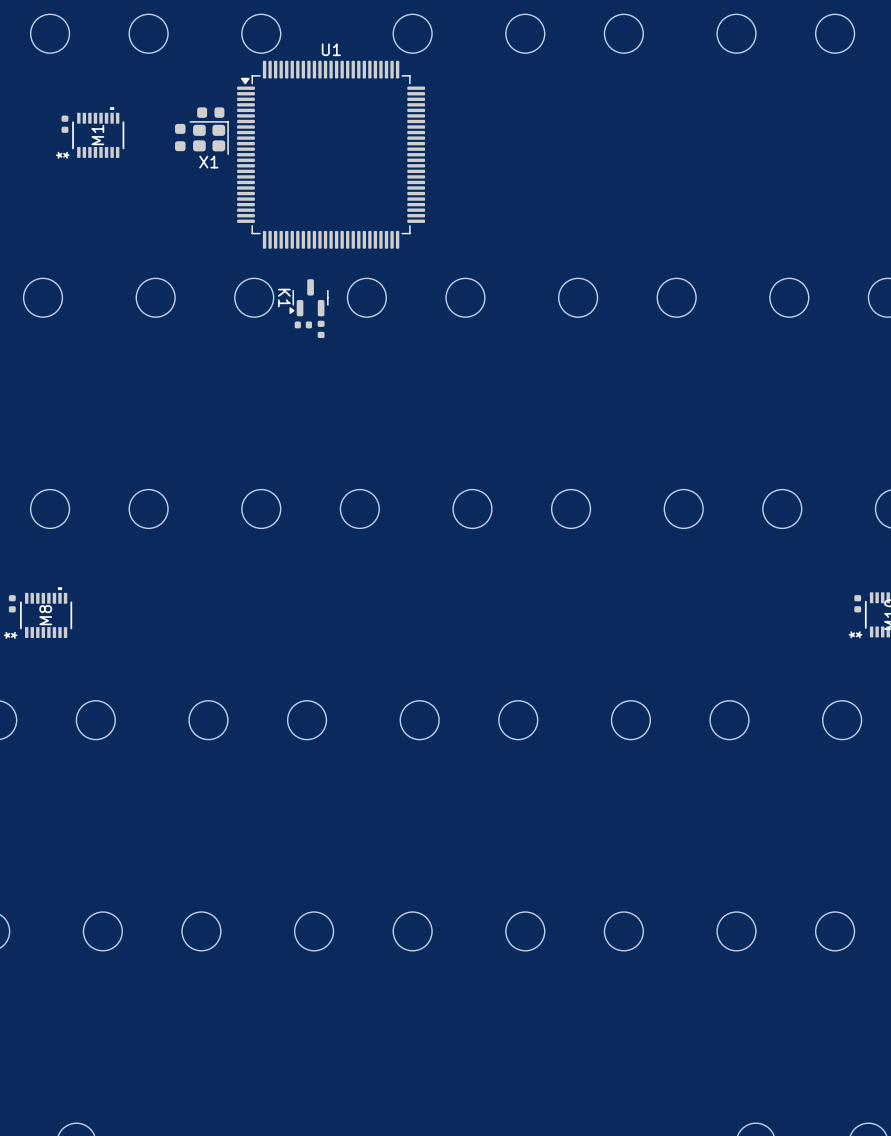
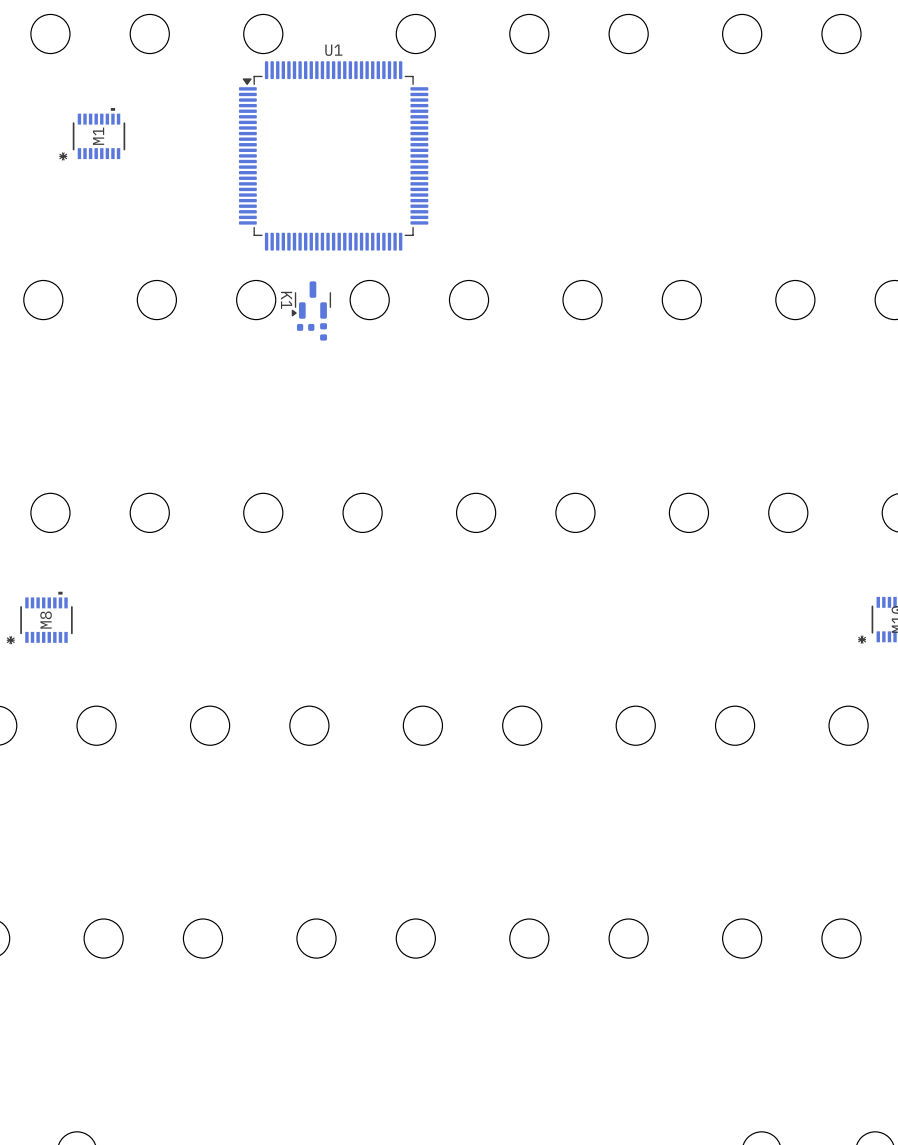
part: (210, 112) -> none
part: (64, 124) -> none
part: (180, 137) -> none
X1: (209, 138) -> none
part: (12, 603) -> none
part: (857, 603) -> none

